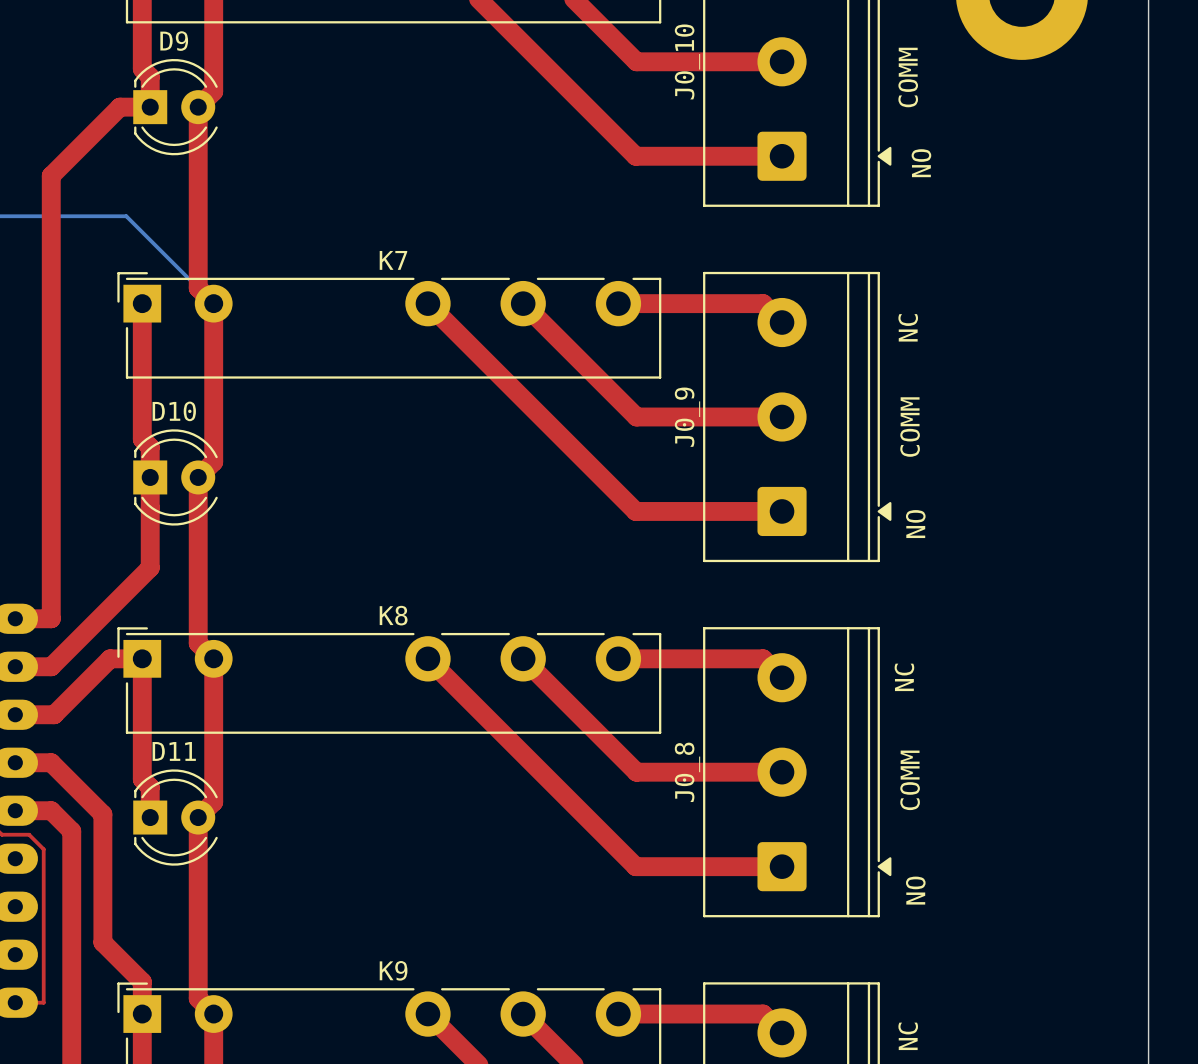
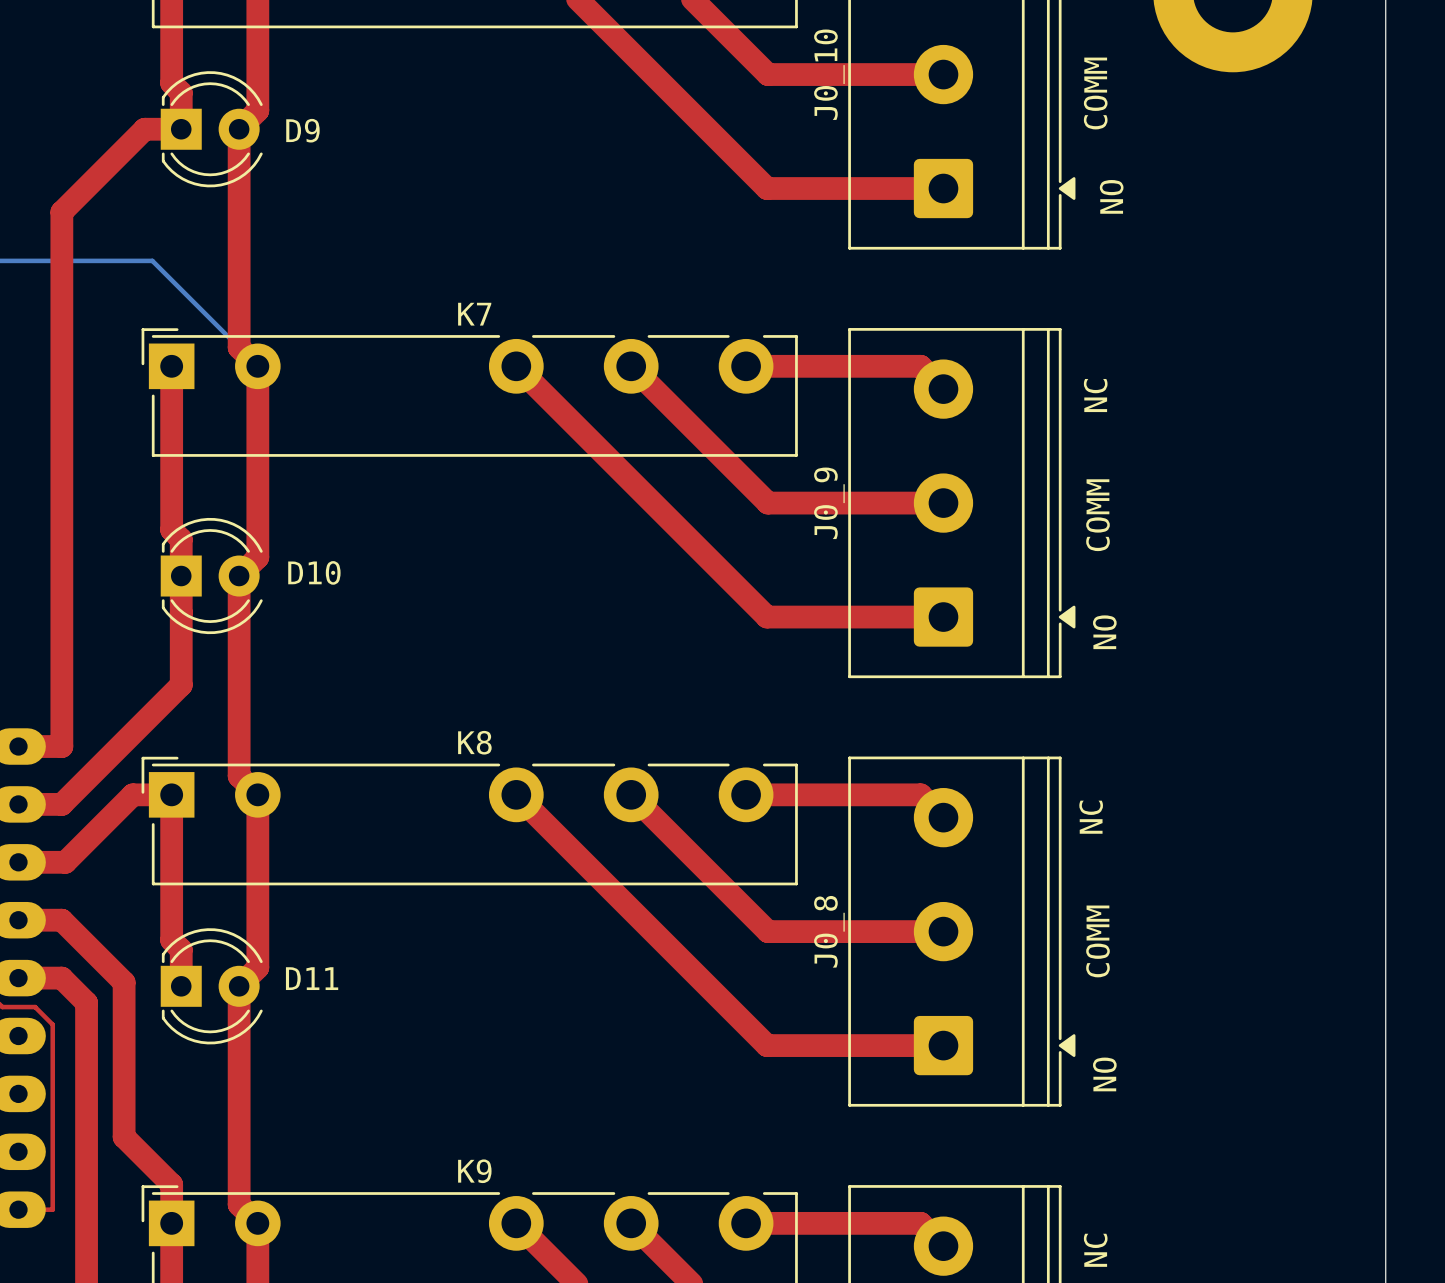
D9 name position: D9 (174, 41) -> D9 (302, 130)
D10 name position: D10 (174, 411) -> D10 (314, 572)
D11 name position: D11 (174, 751) -> D11 (312, 978)

